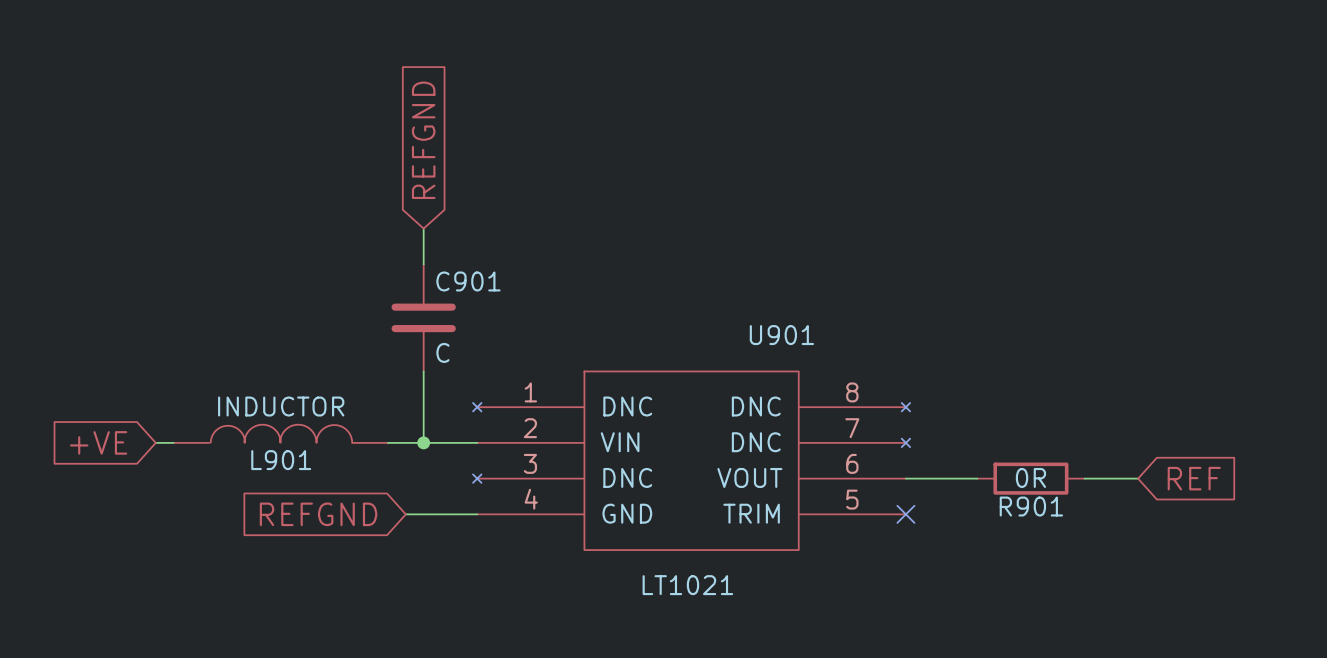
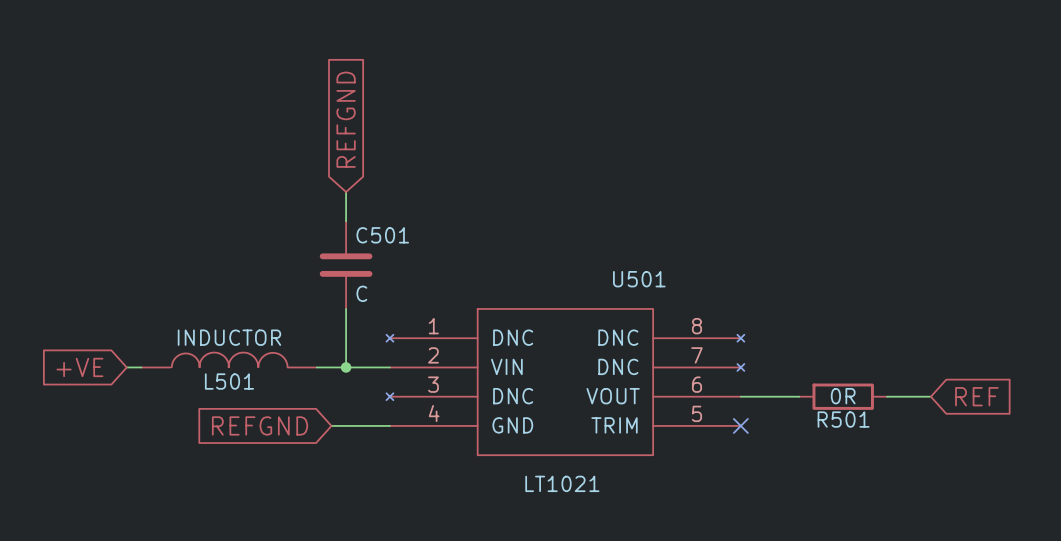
C901 name: C901 (468, 281) -> C501 (382, 235)
U901 name: U901 (781, 335) -> U501 (639, 279)
L901 name: L901 (281, 460) -> L501 (229, 381)
R901 name: R901 (1031, 506) -> R501 (843, 419)

